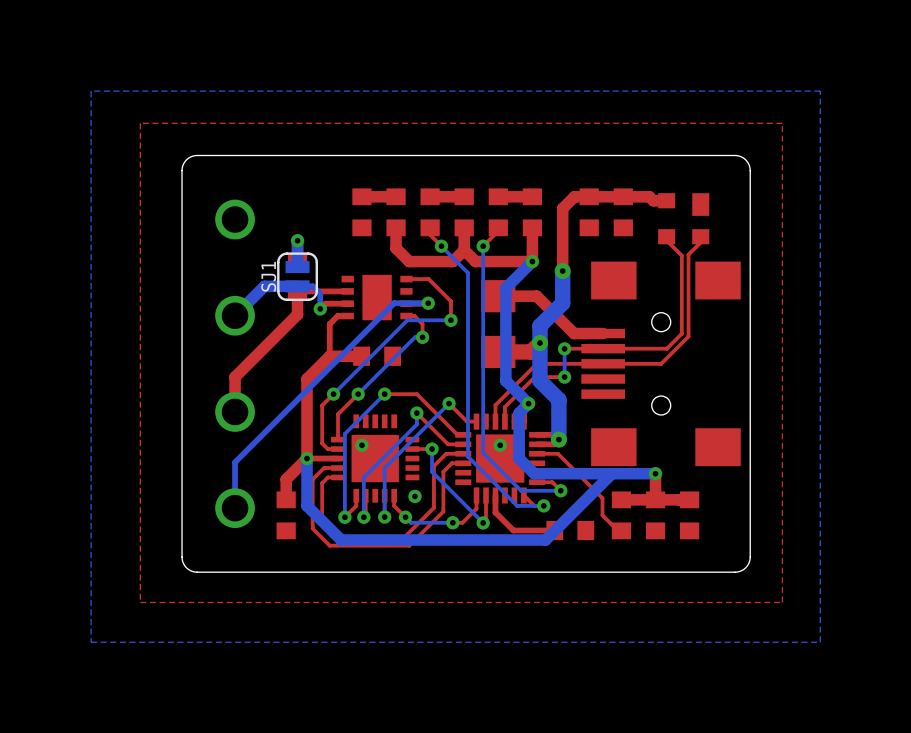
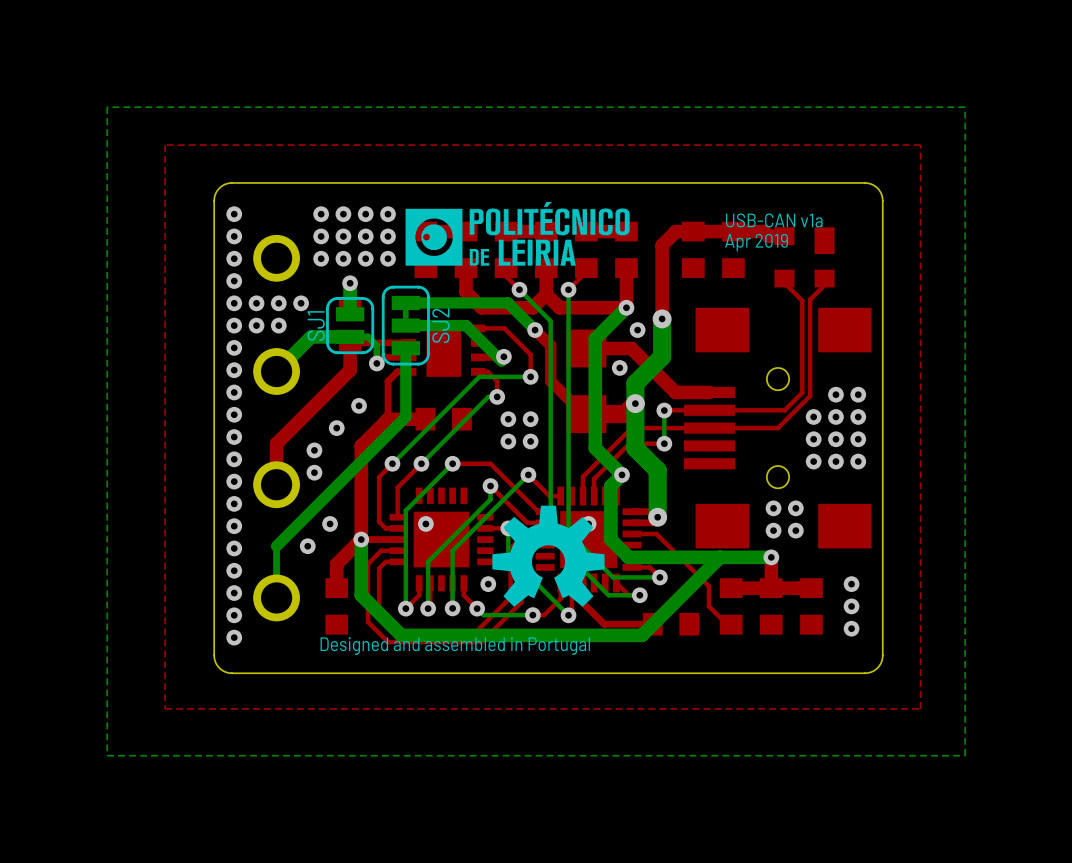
drawing: none -> [405, 201, 630, 266]
via: none -> (234, 214)
via: none -> (321, 214)
via: none -> (343, 214)
via: none -> (365, 214)
via: none -> (388, 214)
text: none -> USB-CAN v1a (774, 220)
via: none -> (234, 236)
via: none -> (321, 236)
via: none -> (343, 236)
via: none -> (365, 236)
via: none -> (388, 236)
text: none -> Apr 2019 (756, 242)
via: none -> (234, 258)
via: none -> (321, 258)
via: none -> (343, 258)
via: none -> (365, 258)
via: none -> (388, 258)
via: none -> (234, 281)
via: none -> (234, 303)
via: none -> (256, 303)
via: none -> (278, 303)
via: none -> (301, 303)
bottom track: none -> (405, 302) (507, 302) (535, 330)
via: none -> (234, 325)
via: none -> (256, 325)
via: none -> (278, 325)
bottom track: none -> (405, 325) (466, 325) (501, 361)
SJ2: none -> (405, 325)
top track: none -> (535, 330) (550, 345) (550, 381) (583, 414) (586, 414)
via: none -> (535, 330)
via: none -> (637, 330)
via: none -> (234, 347)
bottom track: (428, 303) (394, 303) (235, 464) -> (405, 348) (405, 416) (276, 546)
via: none -> (619, 367)
via: none -> (234, 370)
via: none -> (234, 392)
via: none -> (835, 394)
via: none -> (858, 394)
via: none -> (359, 405)
via: none -> (234, 414)
via: none -> (813, 416)
via: none -> (835, 416)
via: none -> (858, 416)
via: none -> (508, 419)
via: none -> (530, 419)
via: none -> (336, 428)
via: none -> (234, 437)
via: none -> (813, 439)
via: none -> (835, 439)
via: none -> (858, 439)
via: none -> (508, 441)
via: none -> (530, 441)
via: none -> (314, 450)
via: none -> (234, 459)
via: none -> (813, 461)
via: none -> (835, 461)
via: none -> (858, 461)
via: none -> (314, 472)
via: none -> (234, 481)
via: none -> (234, 503)
drawing: none -> [492, 505, 605, 607]
via: none -> (773, 508)
via: none -> (795, 508)
via: none -> (330, 523)
via: none -> (234, 526)
via: none -> (773, 530)
via: none -> (795, 530)
via: none -> (307, 546)
via: none -> (234, 548)
via: none -> (234, 570)
via: none -> (851, 584)
via: none -> (234, 593)
via: none -> (851, 606)
via: none -> (234, 615)
via: none -> (851, 628)
via: none -> (234, 637)
text: none -> Designed and assembled in Portugal (455, 646)

